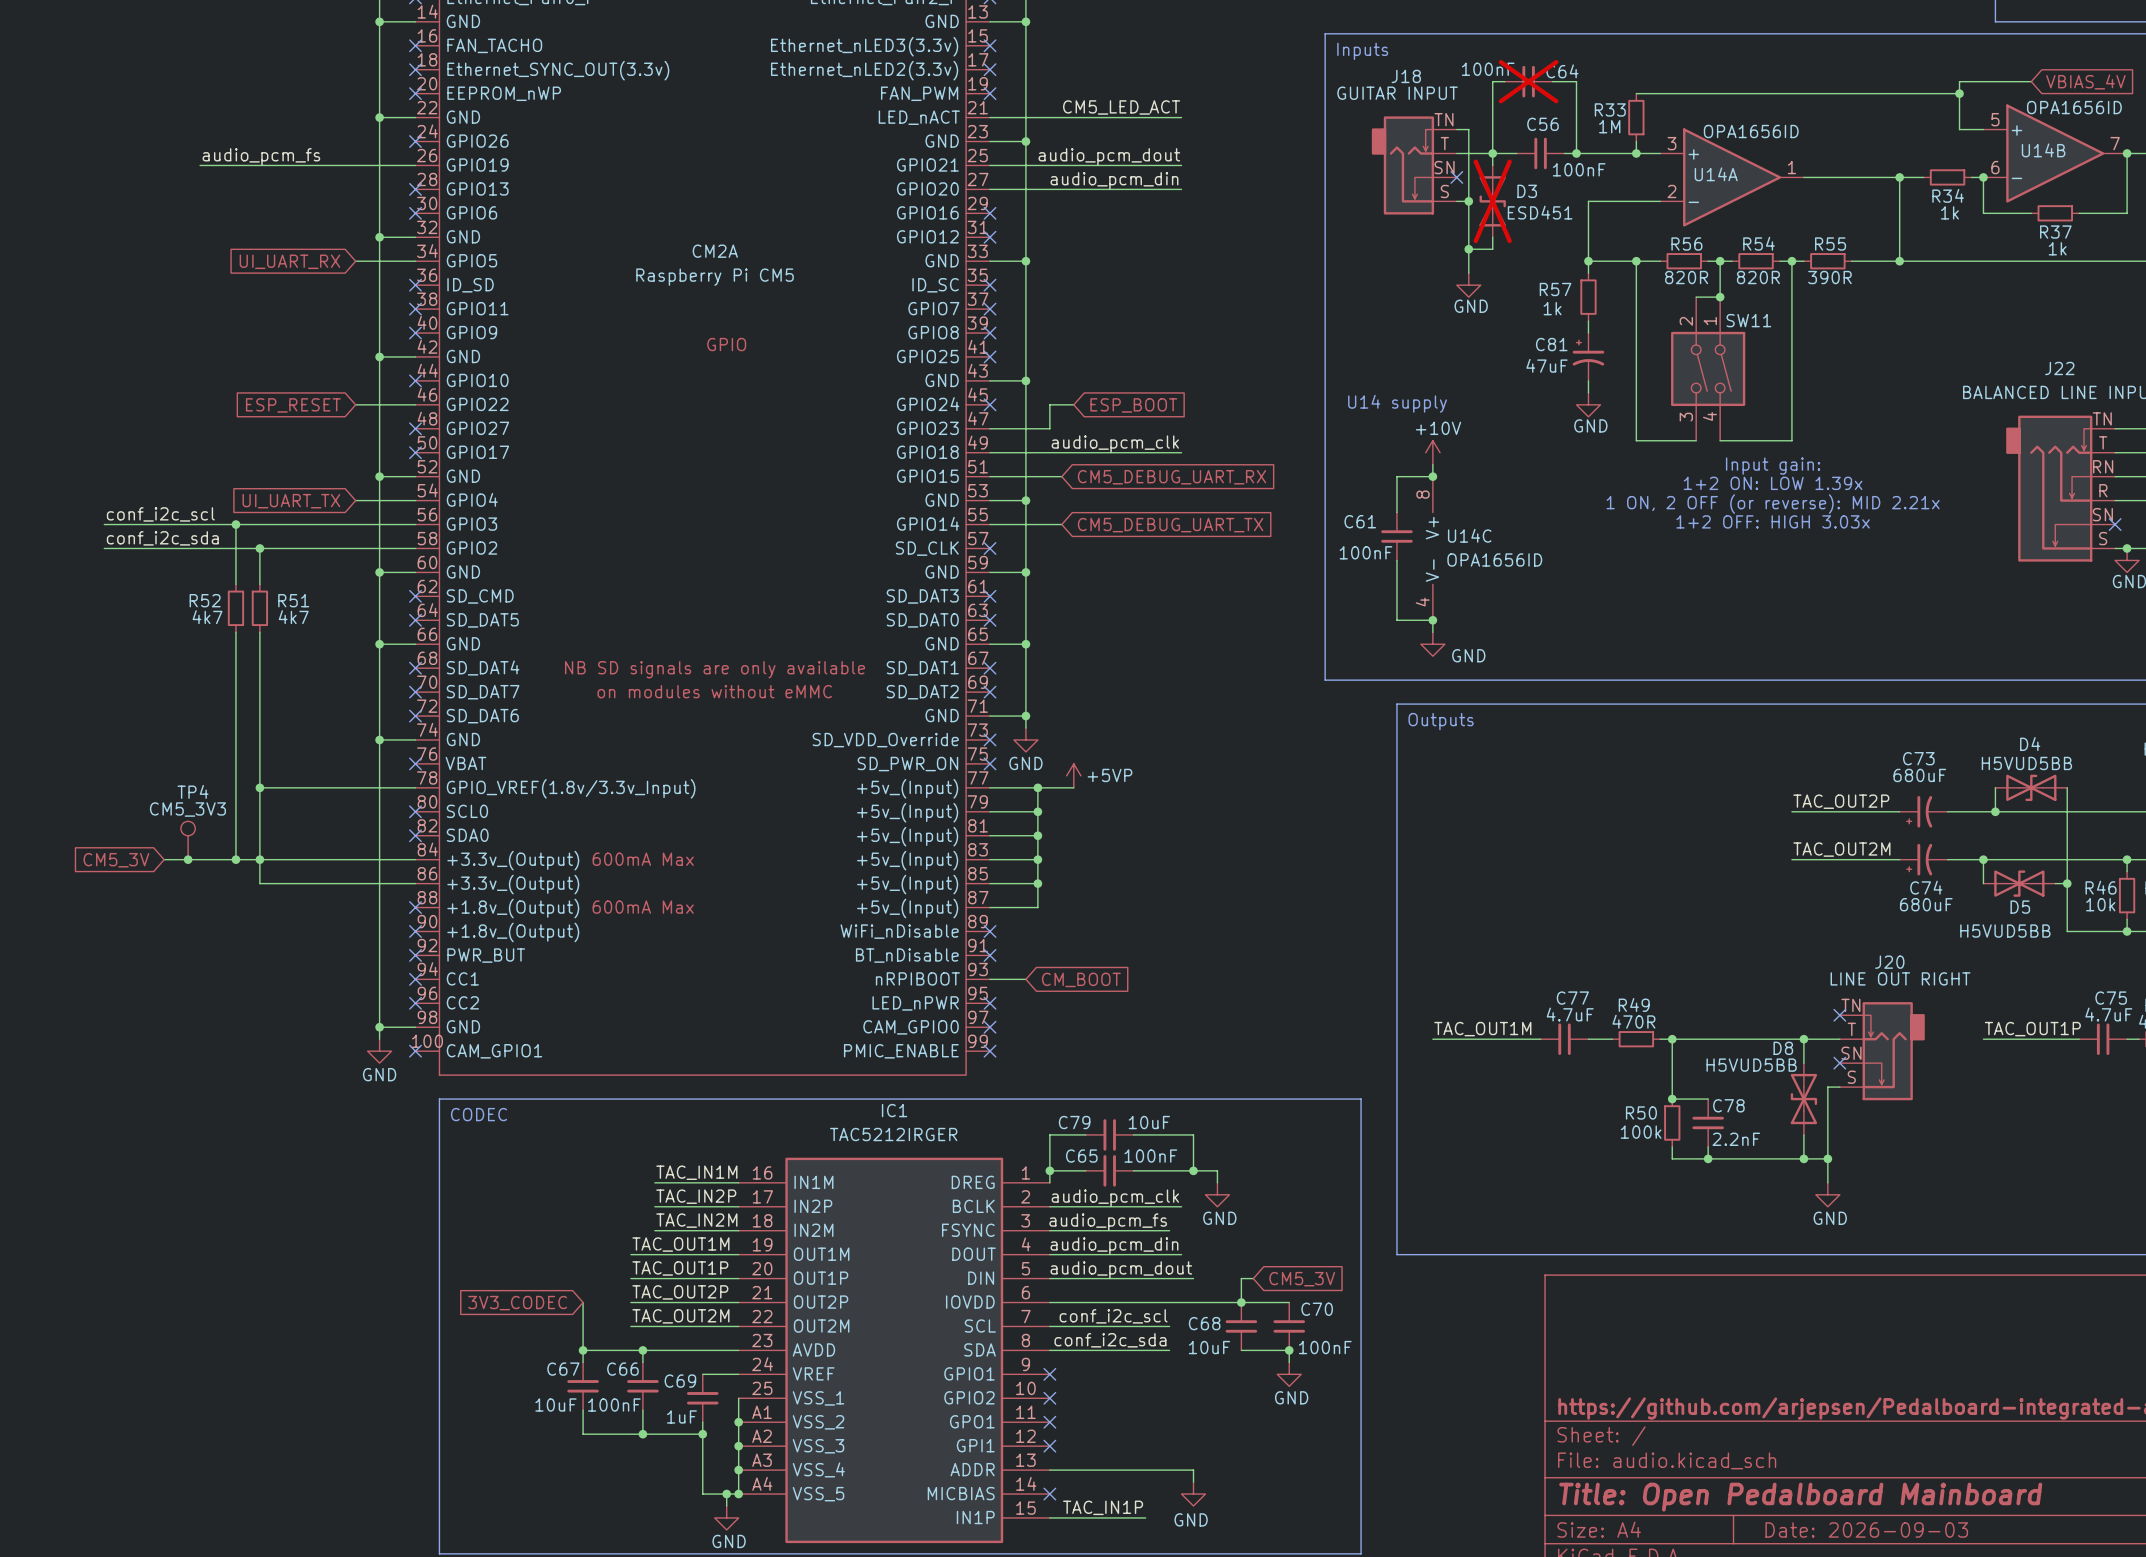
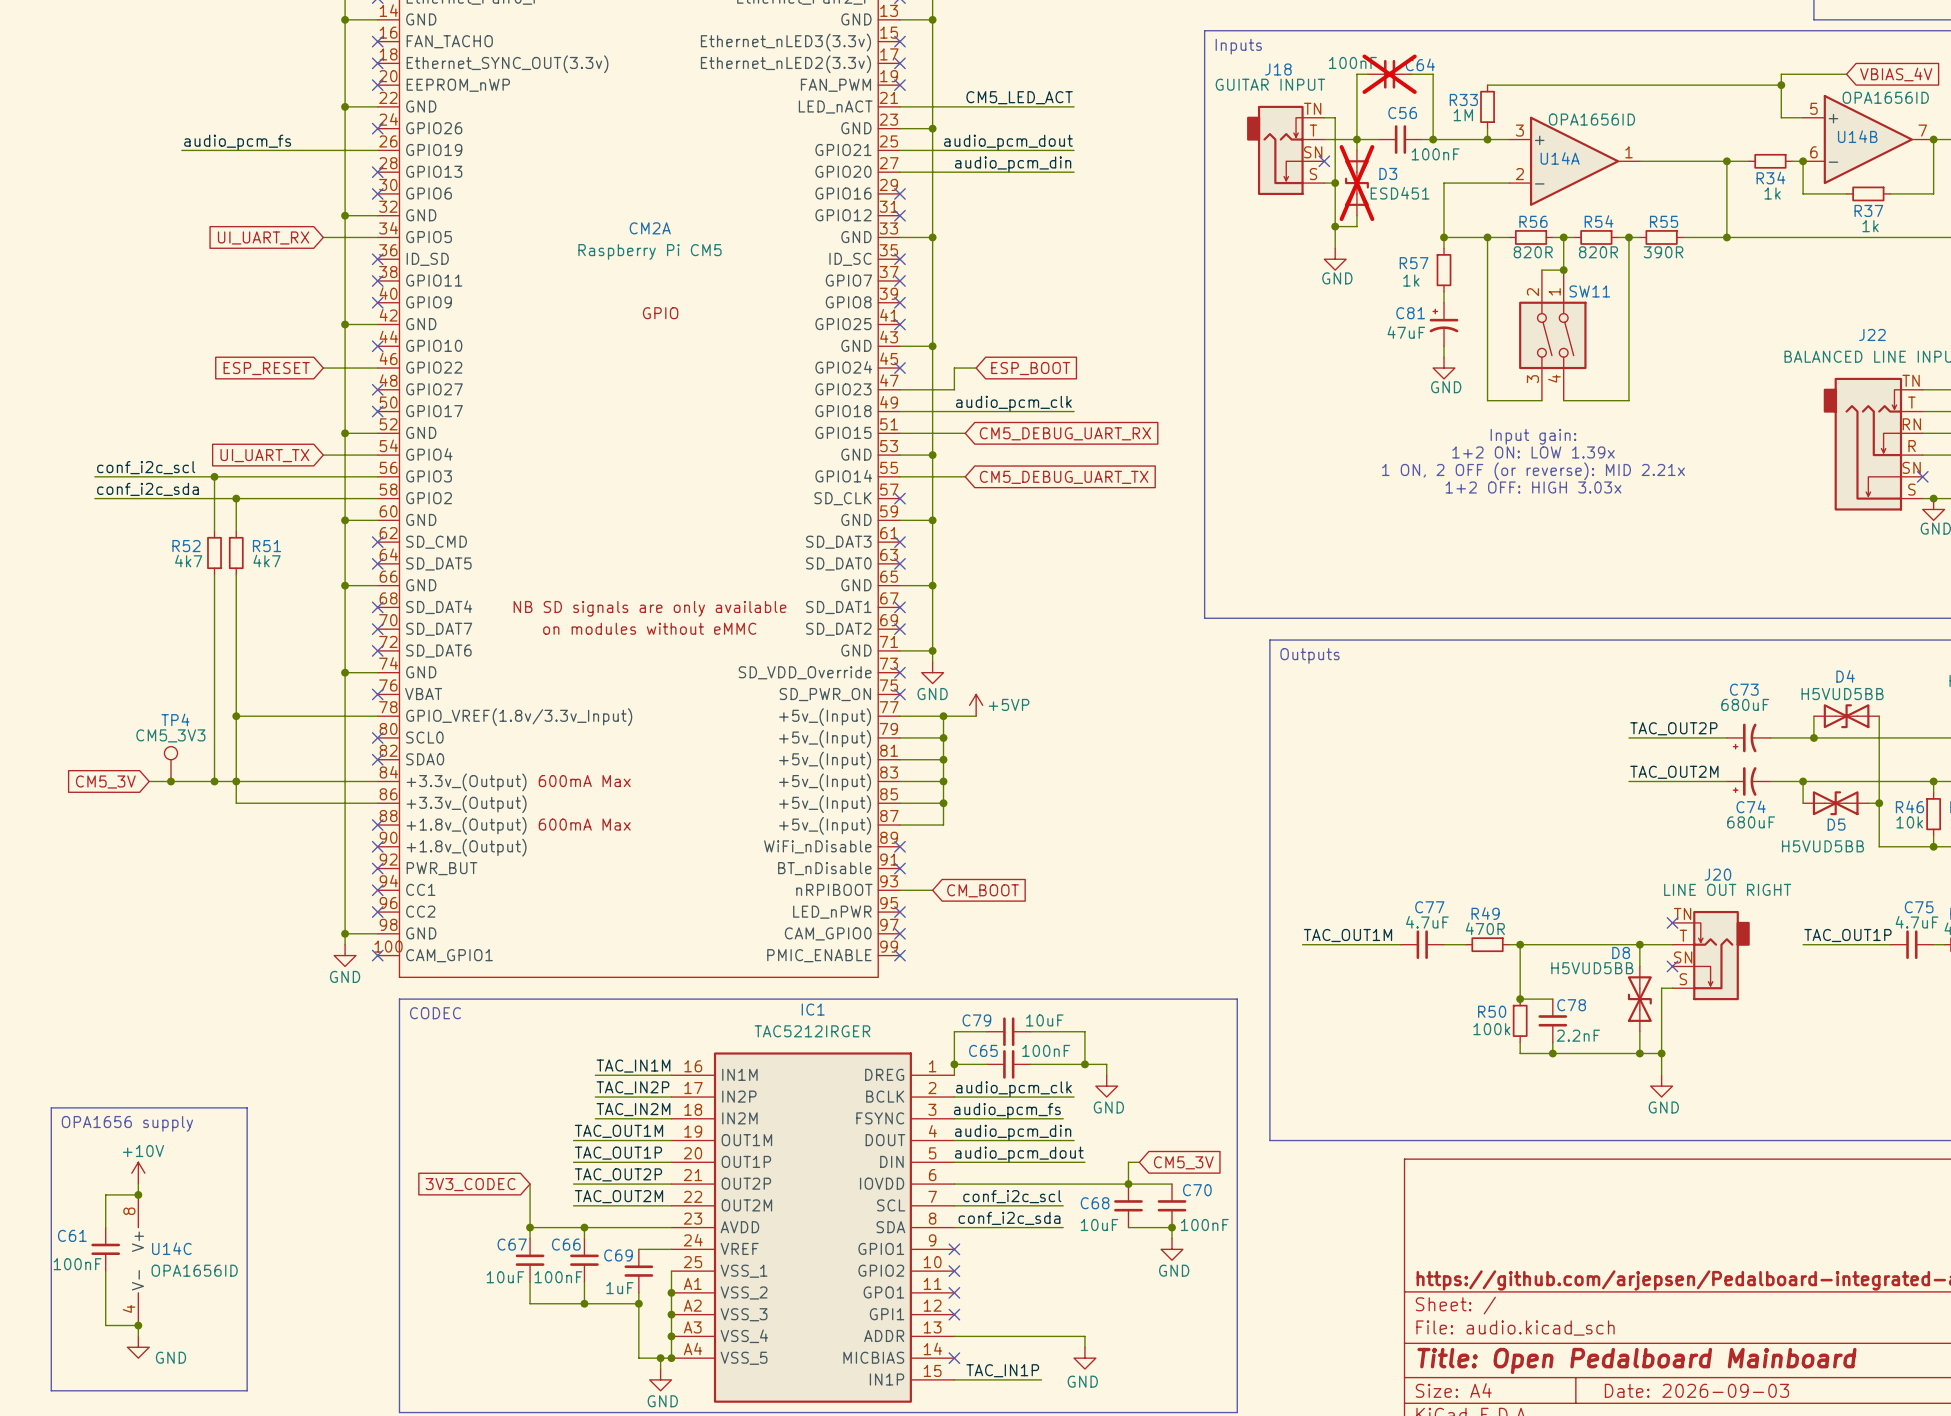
text: U14 supply (1397, 403) -> none
power symbol: +10V (1432, 452) -> none
wire: (1432, 464) (1432, 476) (1396, 476) (1396, 512) -> none
text position: Input gain: (1773, 466) -> Input gain: (1533, 436)
junction: (1432, 476) -> none
text position: 1+2 ON: LOW 1.39x (1773, 483) -> 1+2 ON: LOW 1.39x (1533, 452)
text position: 1 ON, 2 OFF (or reverse): MID 2.21x (1773, 504) -> 1 ON, 2 OFF (or reverse): MID 2.21x (1533, 471)
text position: 1+2 OFF: HIGH 3.03x (1773, 521) -> 1+2 OFF: HIGH 3.03x (1533, 487)
C61 position: (1396, 536) -> (105, 1249)
U14C position: (1432, 548) -> (138, 1260)
wire: (1396, 560) (1396, 620) (1432, 620) (1432, 632) -> none
junction: (1432, 620) -> none
power symbol: GND (1432, 644) -> none
line: none -> (51, 1107) (247, 1107) (247, 1390) (51, 1390) (51, 1107)
text: none -> OPA1656 supply (127, 1123)
power symbol: none -> +10V (138, 1173)
wire: none -> (138, 1184) (138, 1194) (105, 1194) (105, 1227)
junction: none -> (138, 1194)
wire: none -> (105, 1271) (105, 1325) (138, 1325) (138, 1336)
junction: none -> (138, 1325)
power symbol: none -> GND (138, 1347)

